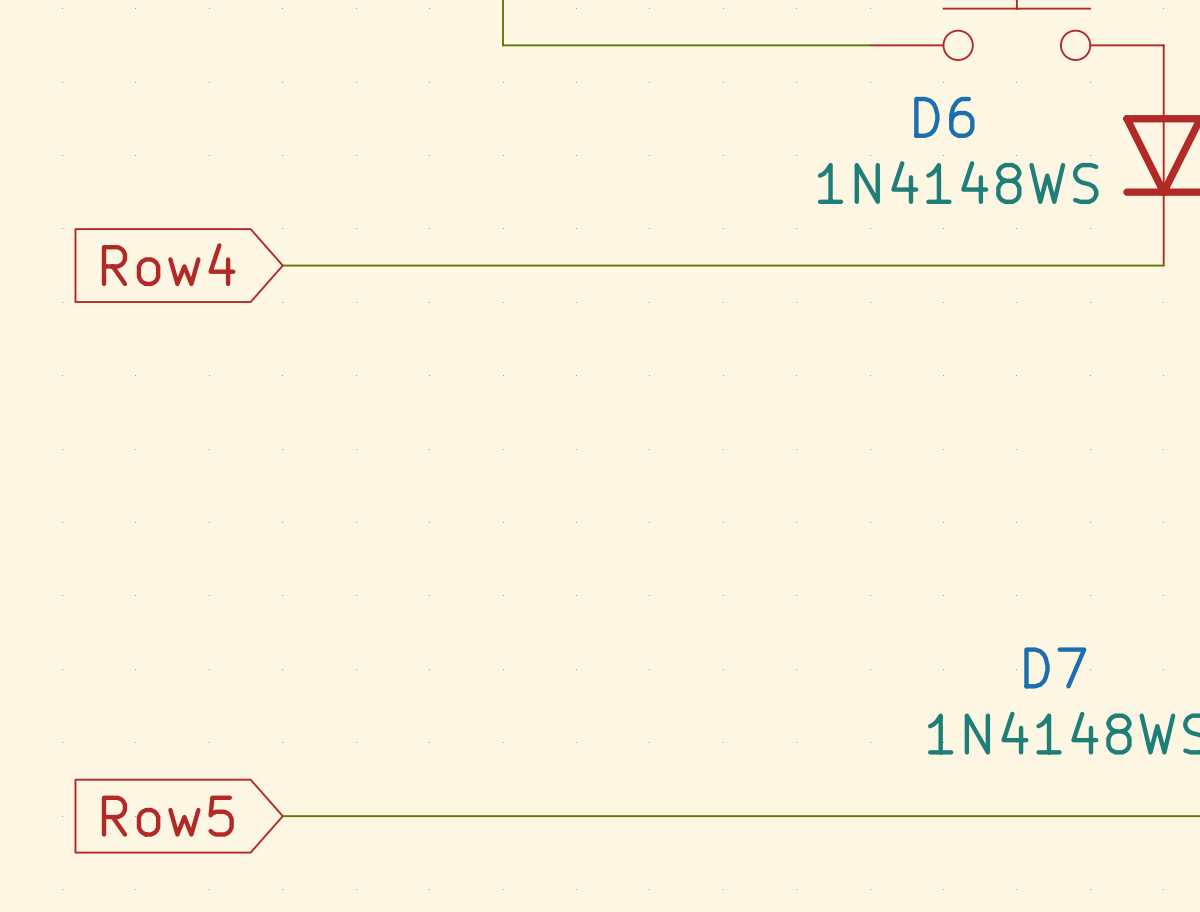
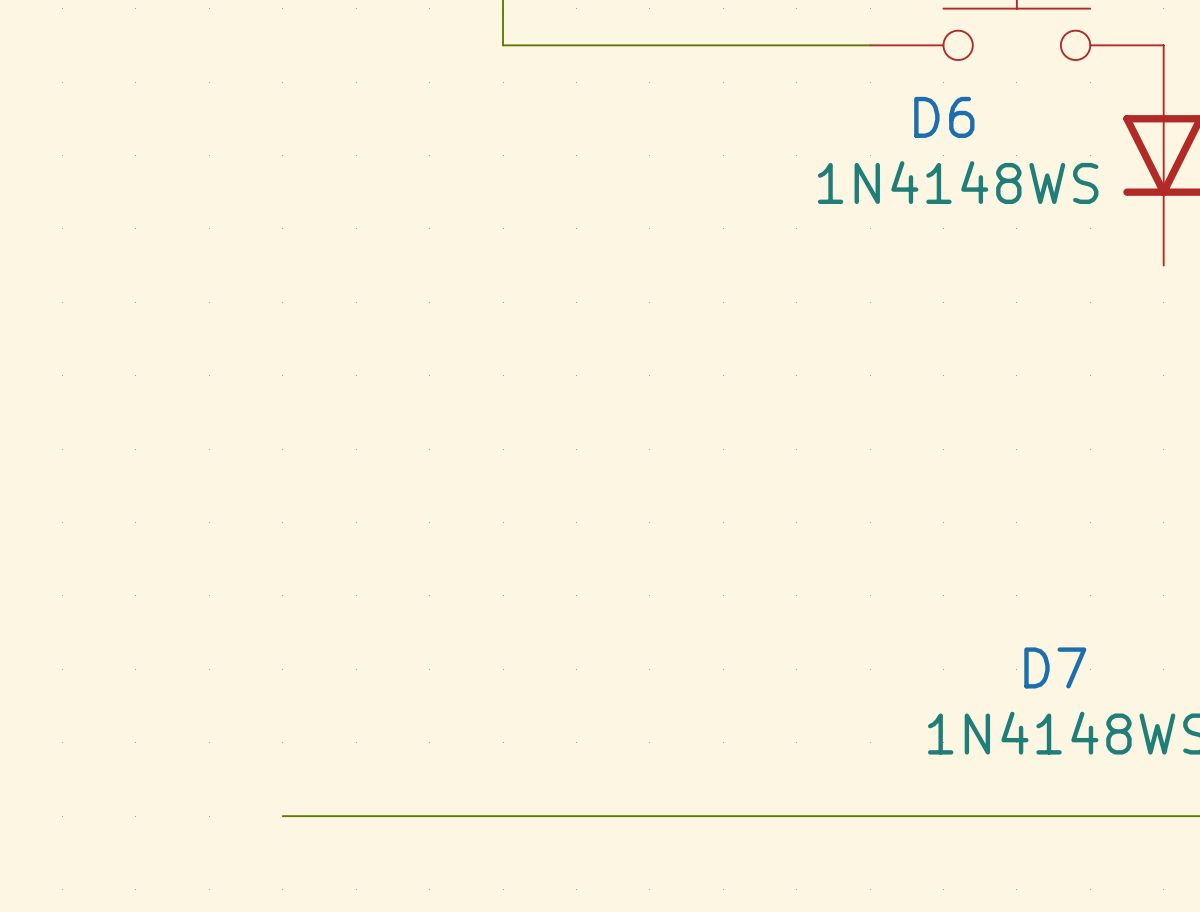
global label: Row4 (168, 264) -> none
wire: (282, 265) (1163, 265) -> none
global label: Row5 (167, 816) -> none

